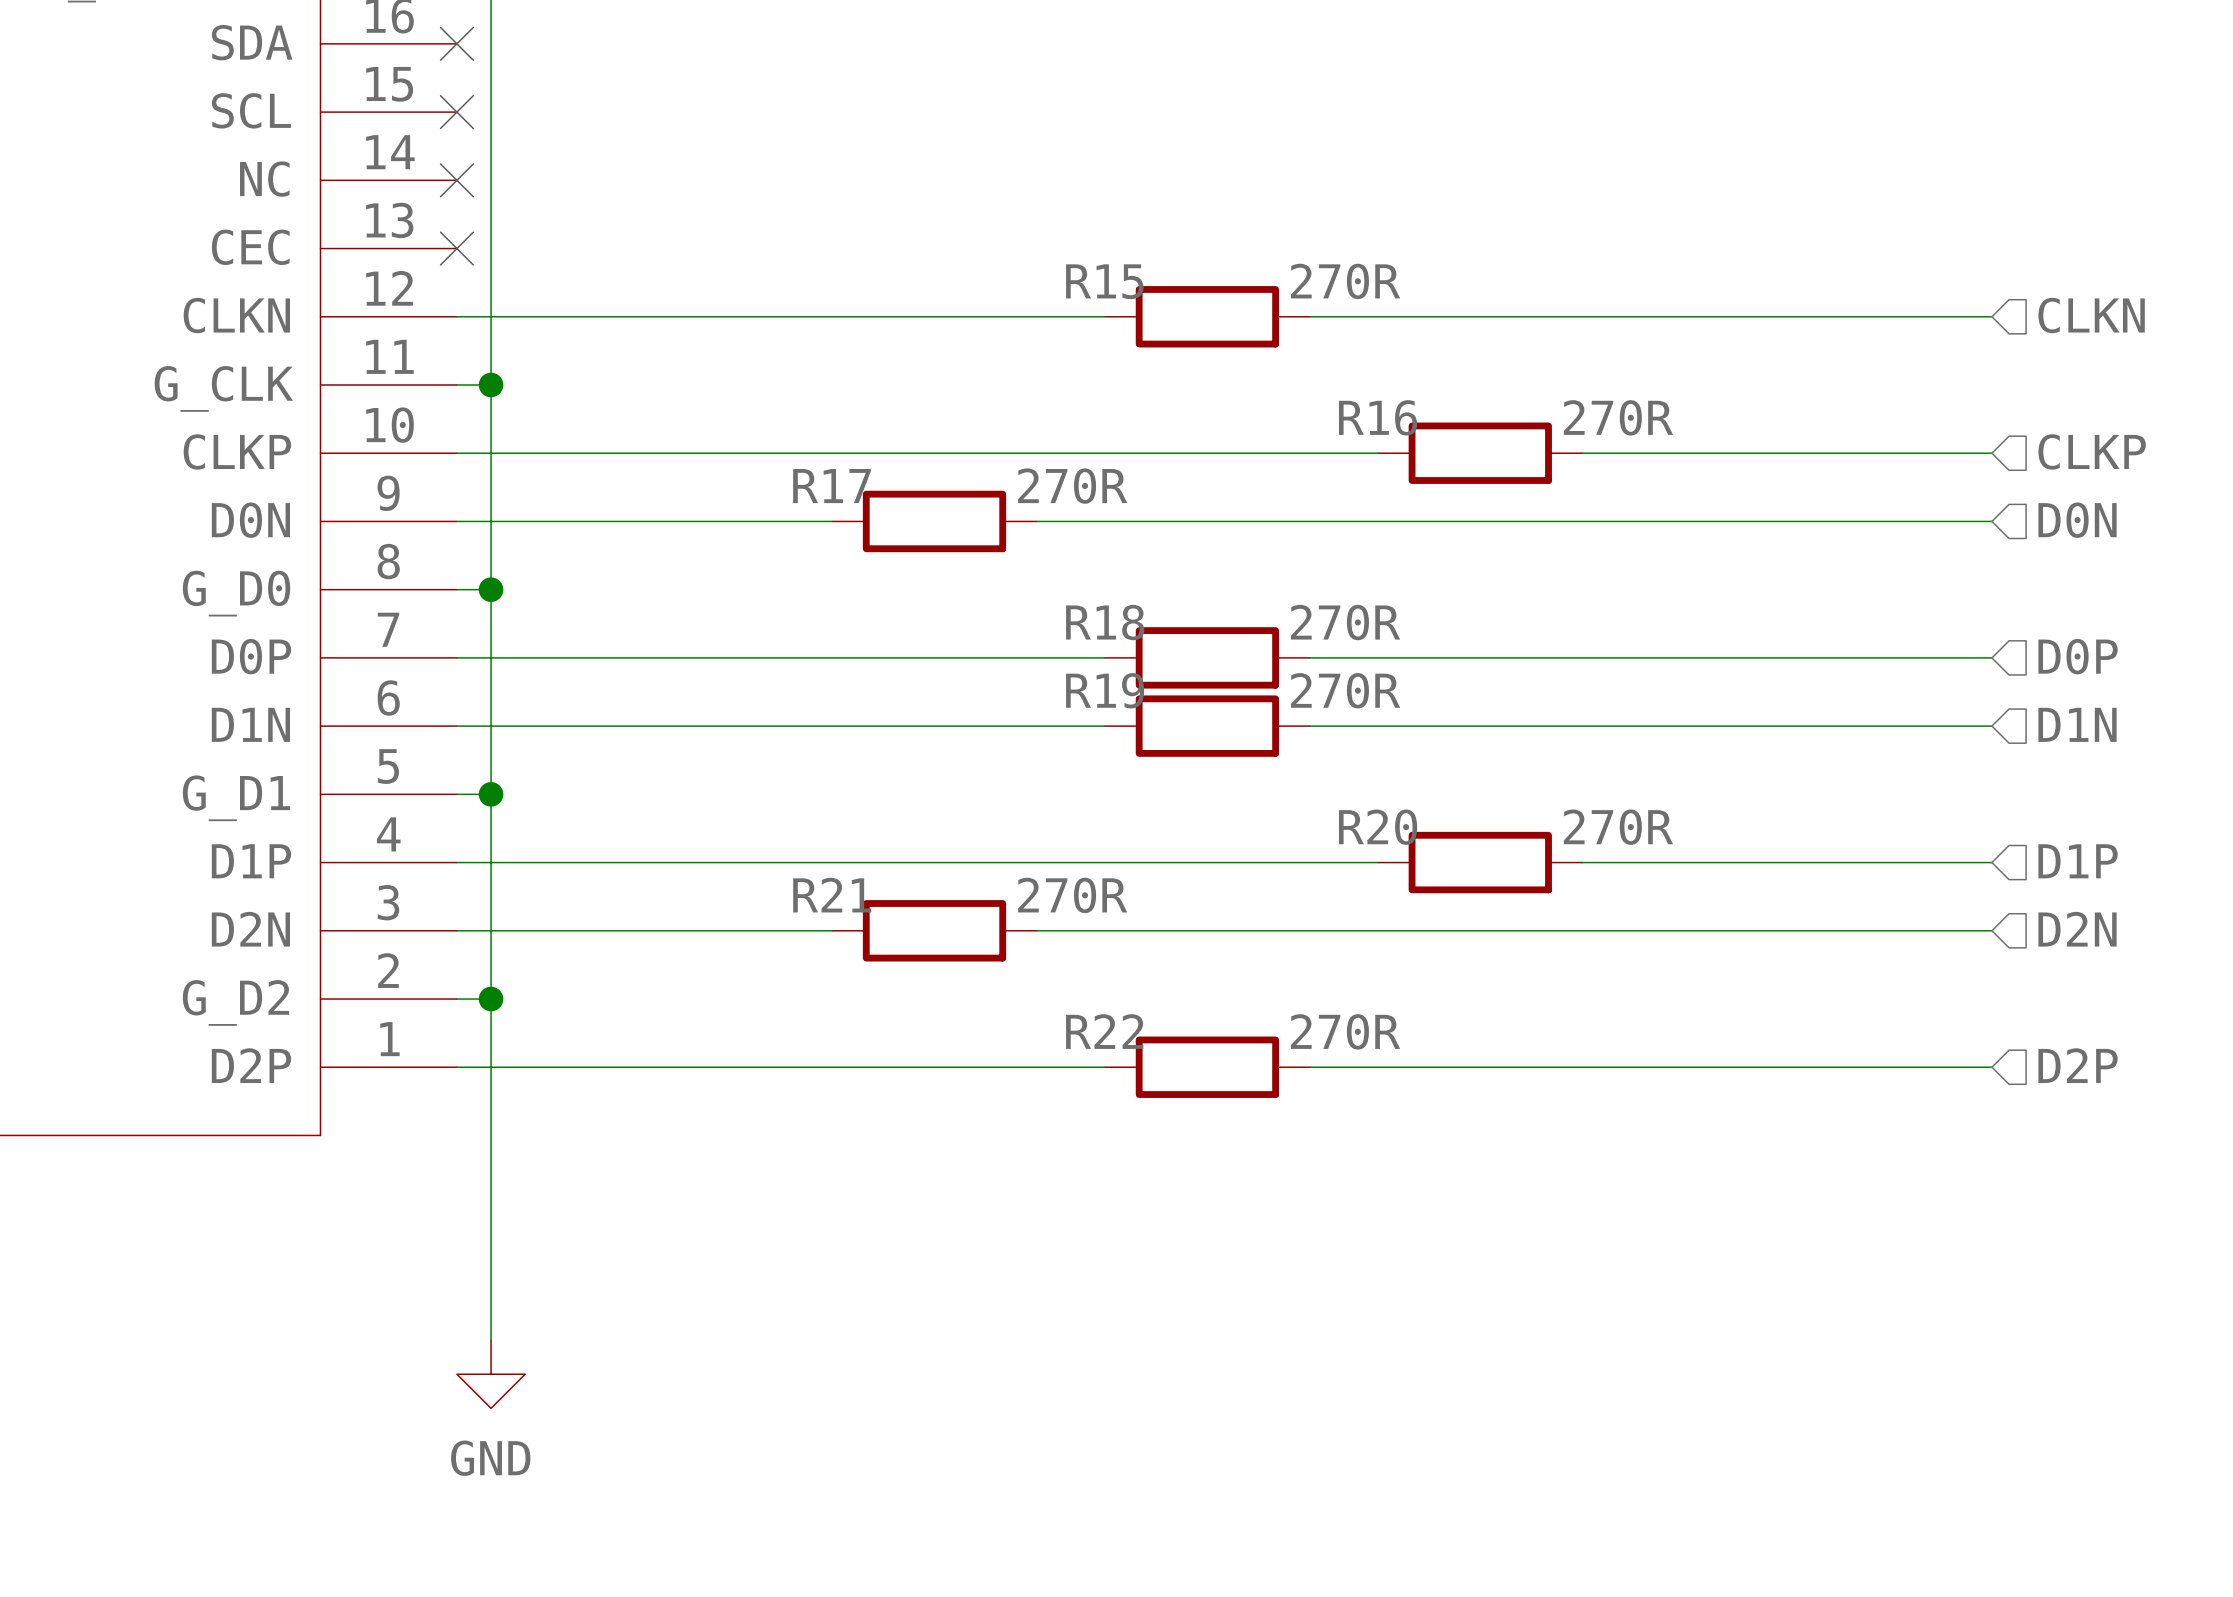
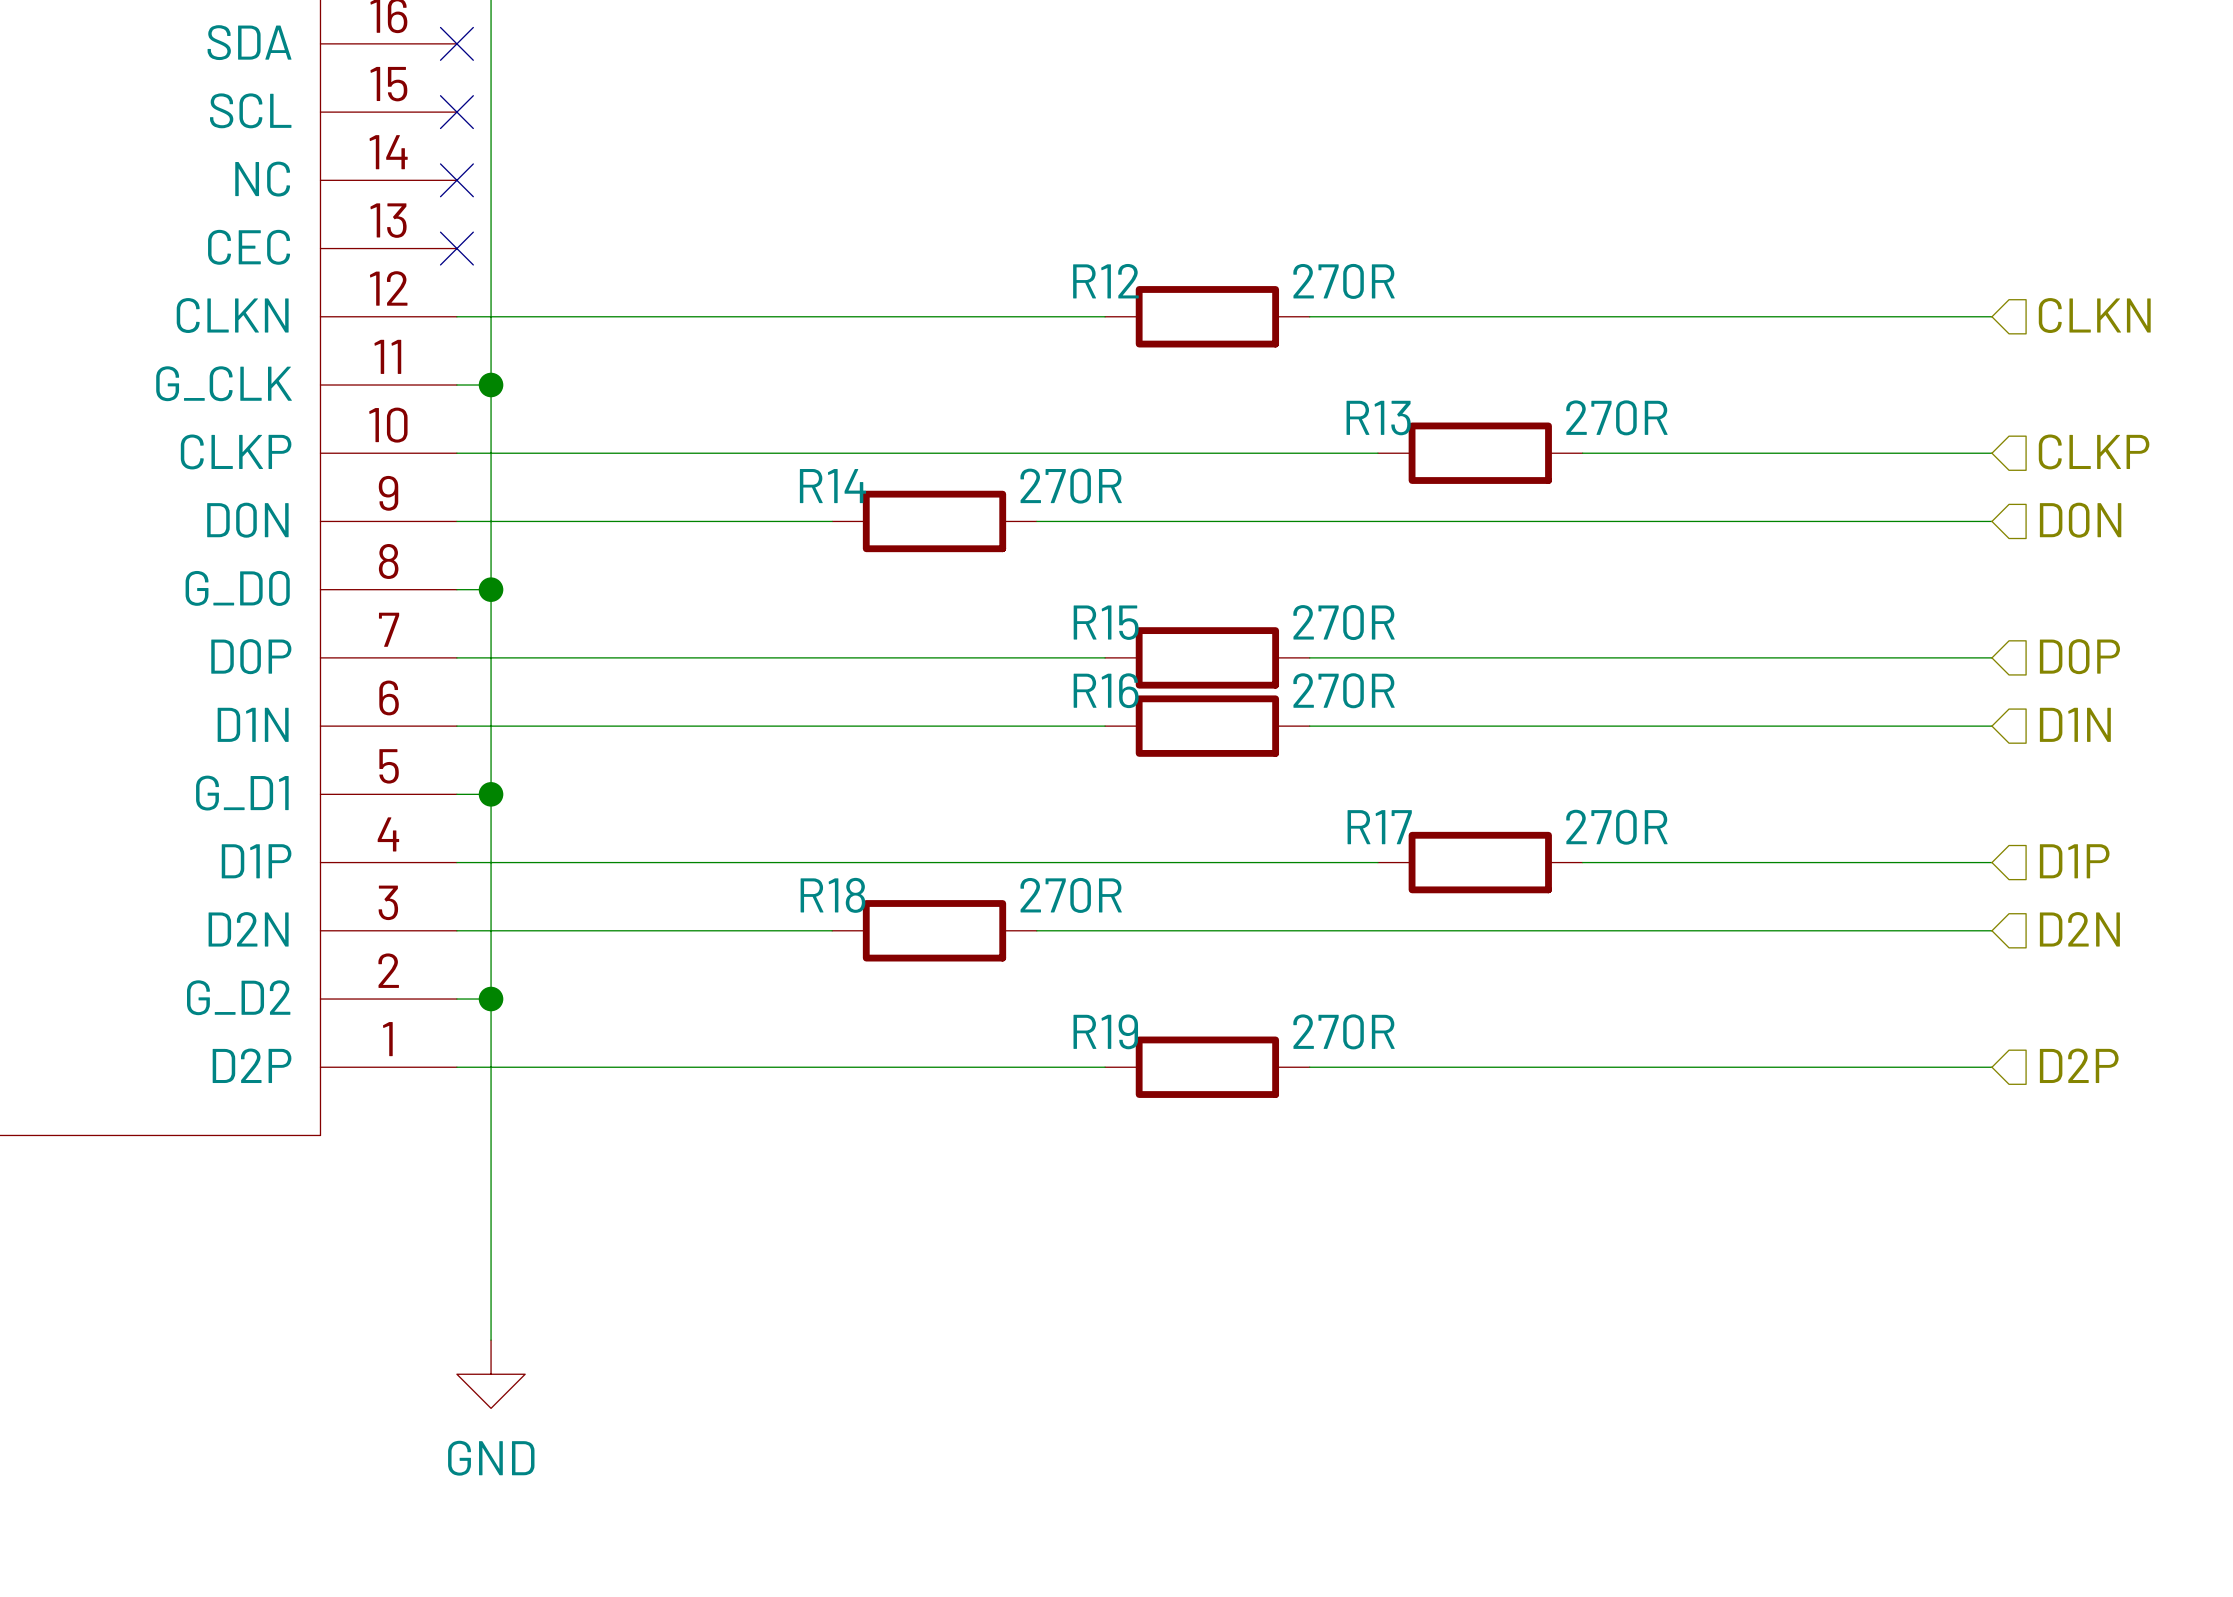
R15 name: R15 (1104, 281) -> R12 (1105, 281)
R16 name: R16 (1378, 417) -> R13 (1378, 418)
R17 name: R17 (832, 486) -> R14 (832, 486)
R18 name: R18 (1105, 622) -> R15 (1106, 622)
R19 name: R19 (1105, 690) -> R16 (1106, 690)
R20 name: R20 (1378, 827) -> R17 (1379, 827)
R21 name: R21 (832, 895) -> R18 (832, 895)
R22 name: R22 (1104, 1031) -> R19 (1105, 1031)

